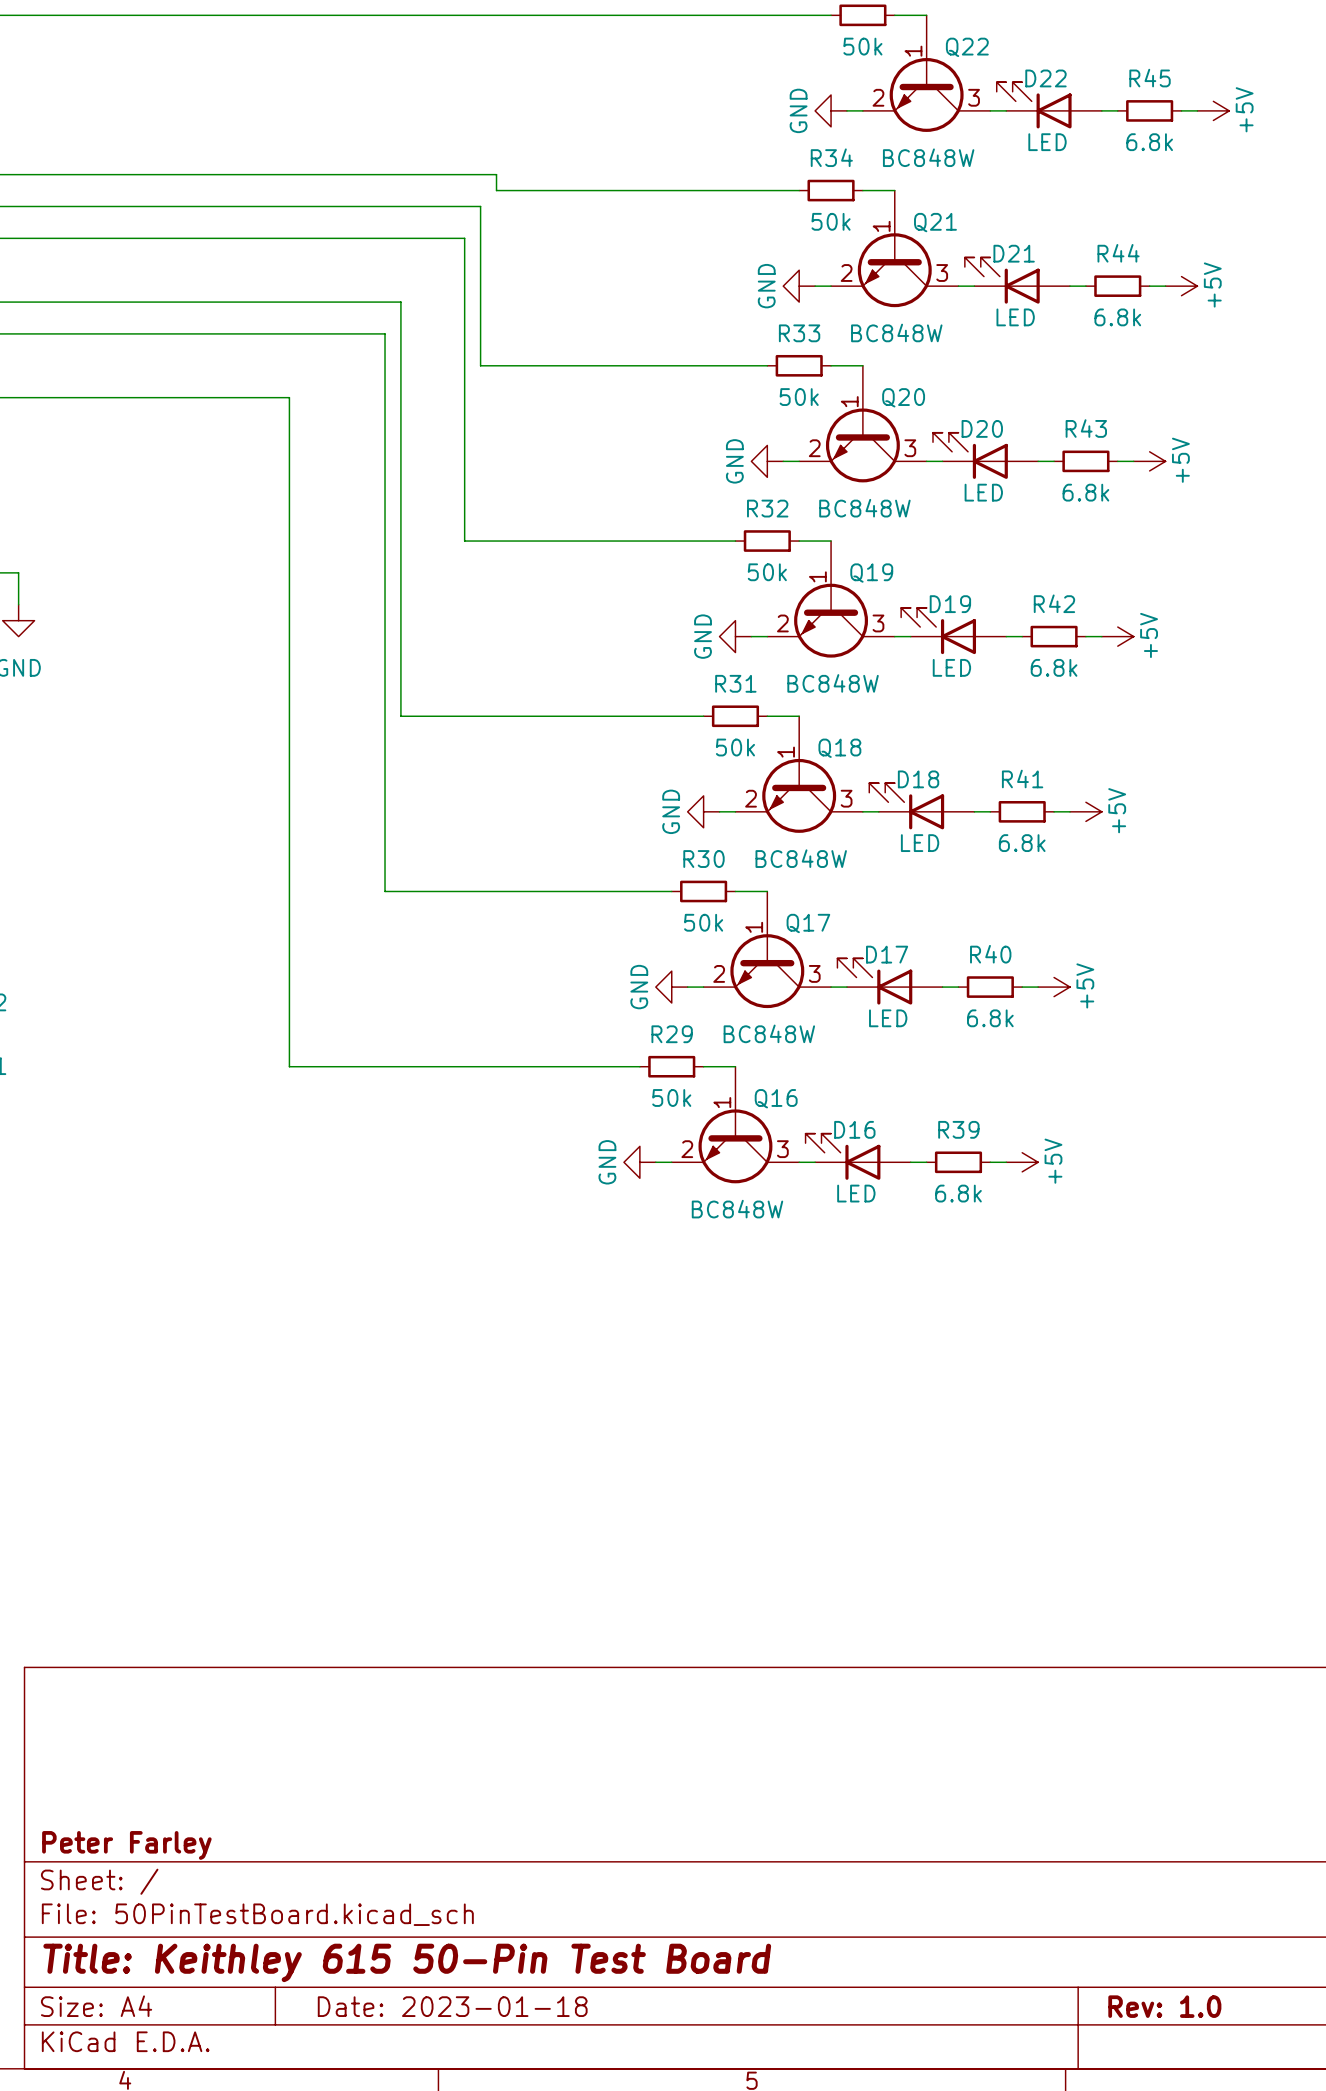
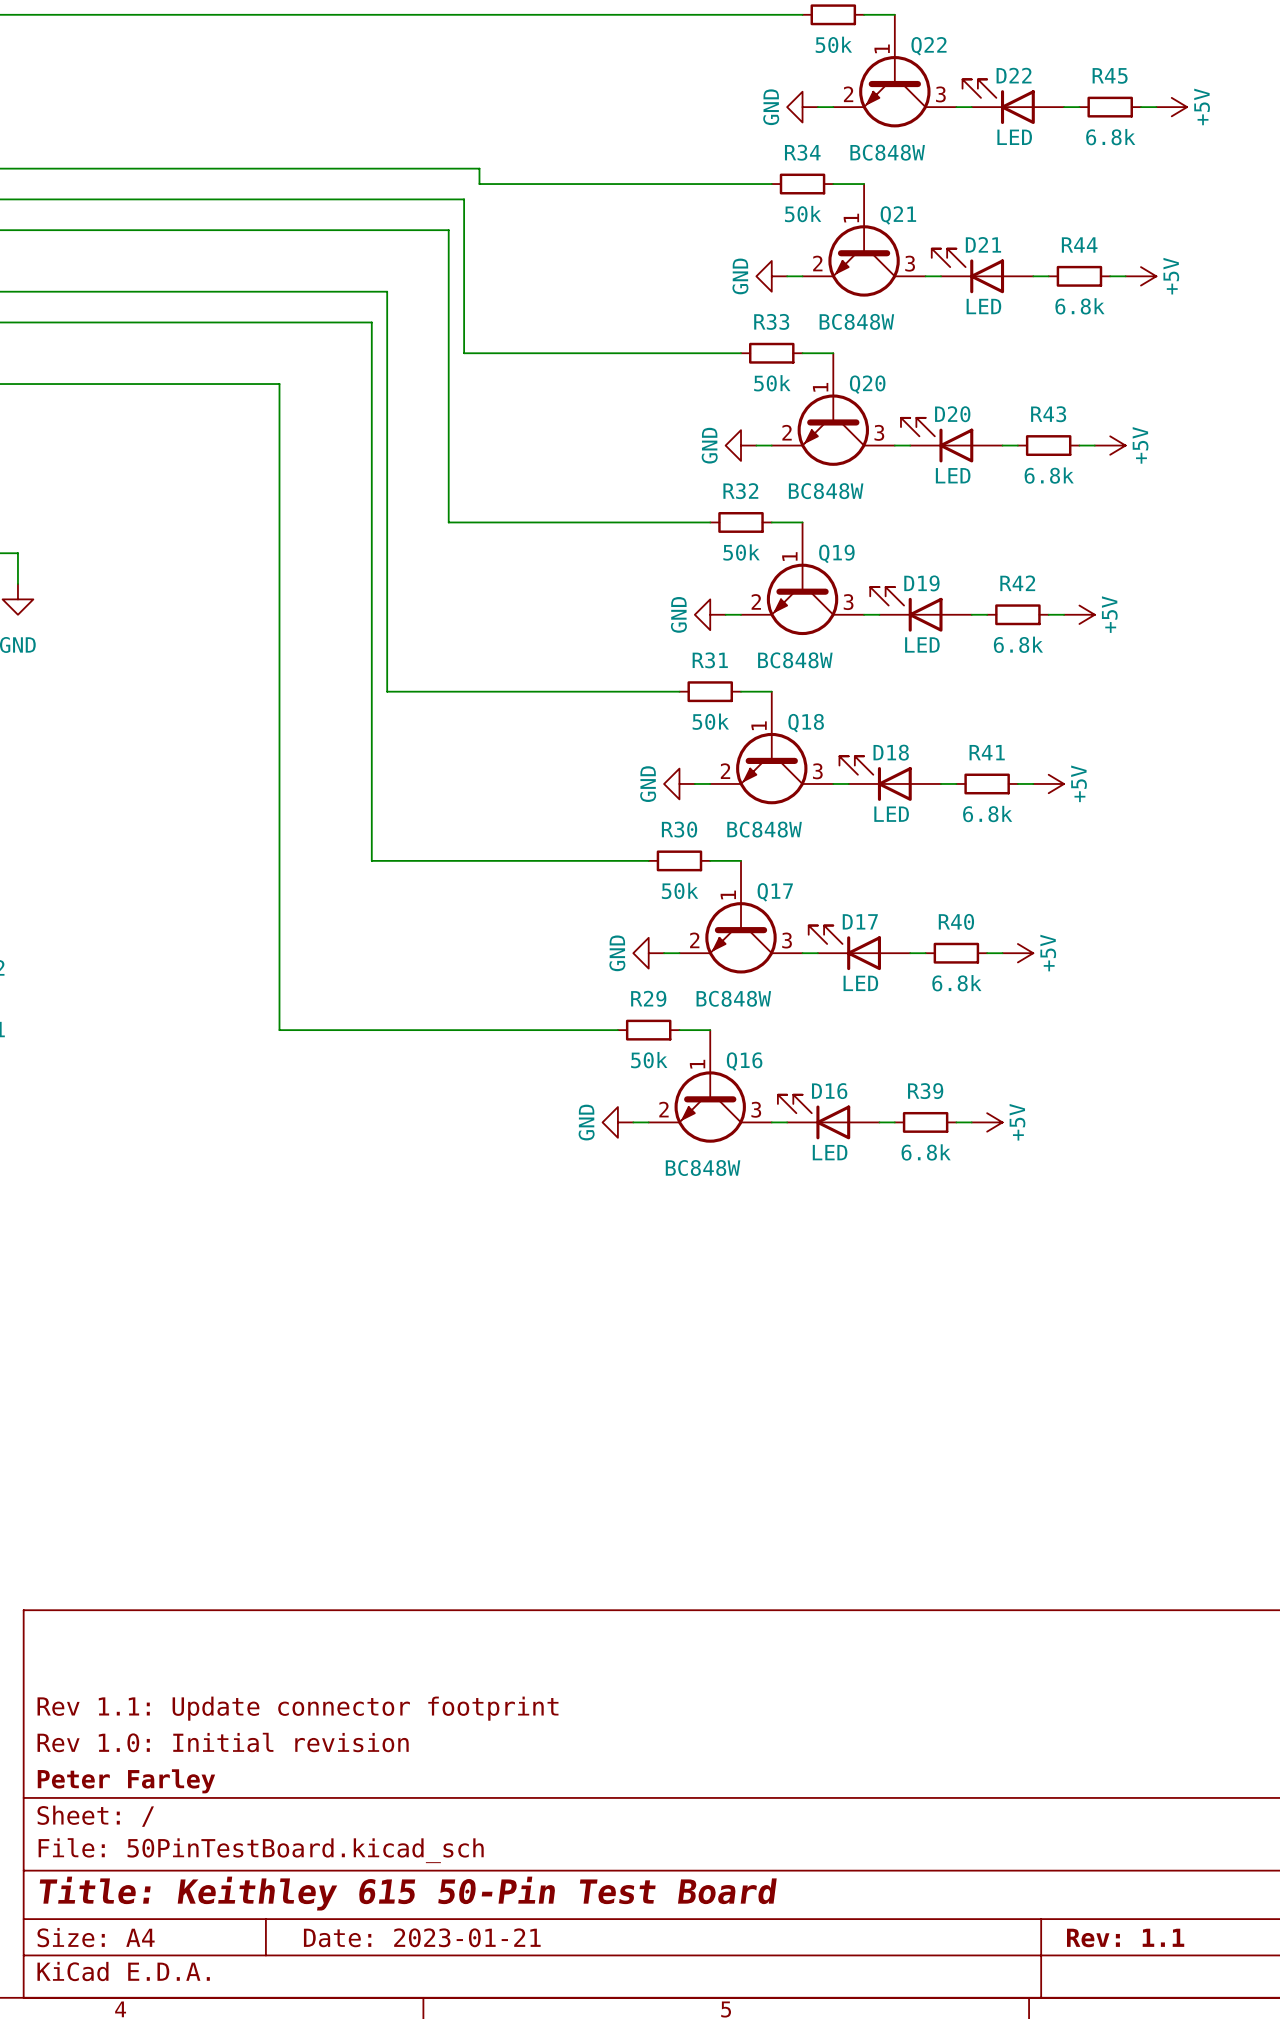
title block: none -> Rev 1.1: Update connector footprint (298, 1708)
title block: none -> Rev 1.0: Initial revision (223, 1742)
title block: Date: 2023-01-18 (452, 2006) -> Date: 2023-01-21 (422, 1937)
title block: Rev: 1.0 (1164, 2006) -> Rev: 1.1 (1125, 1937)

